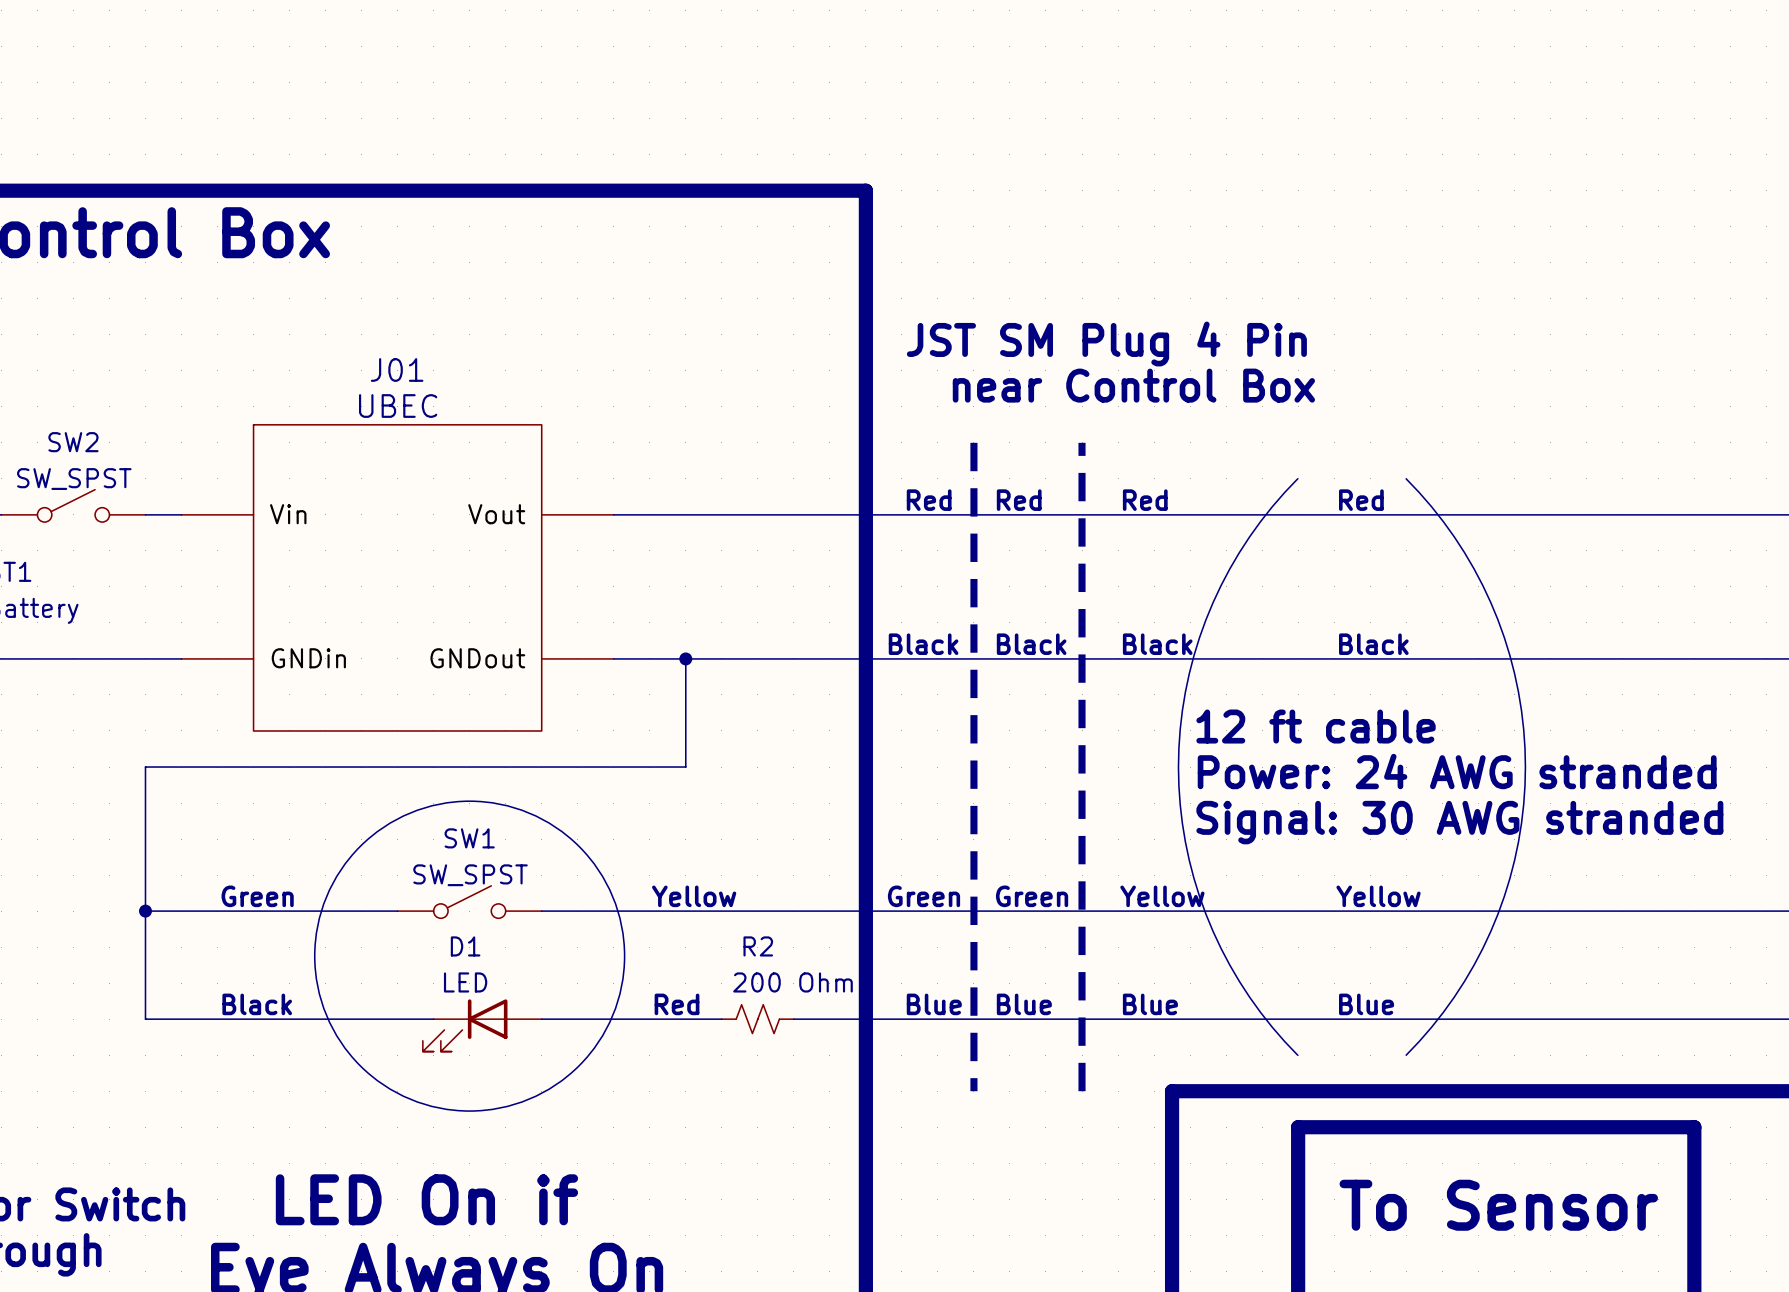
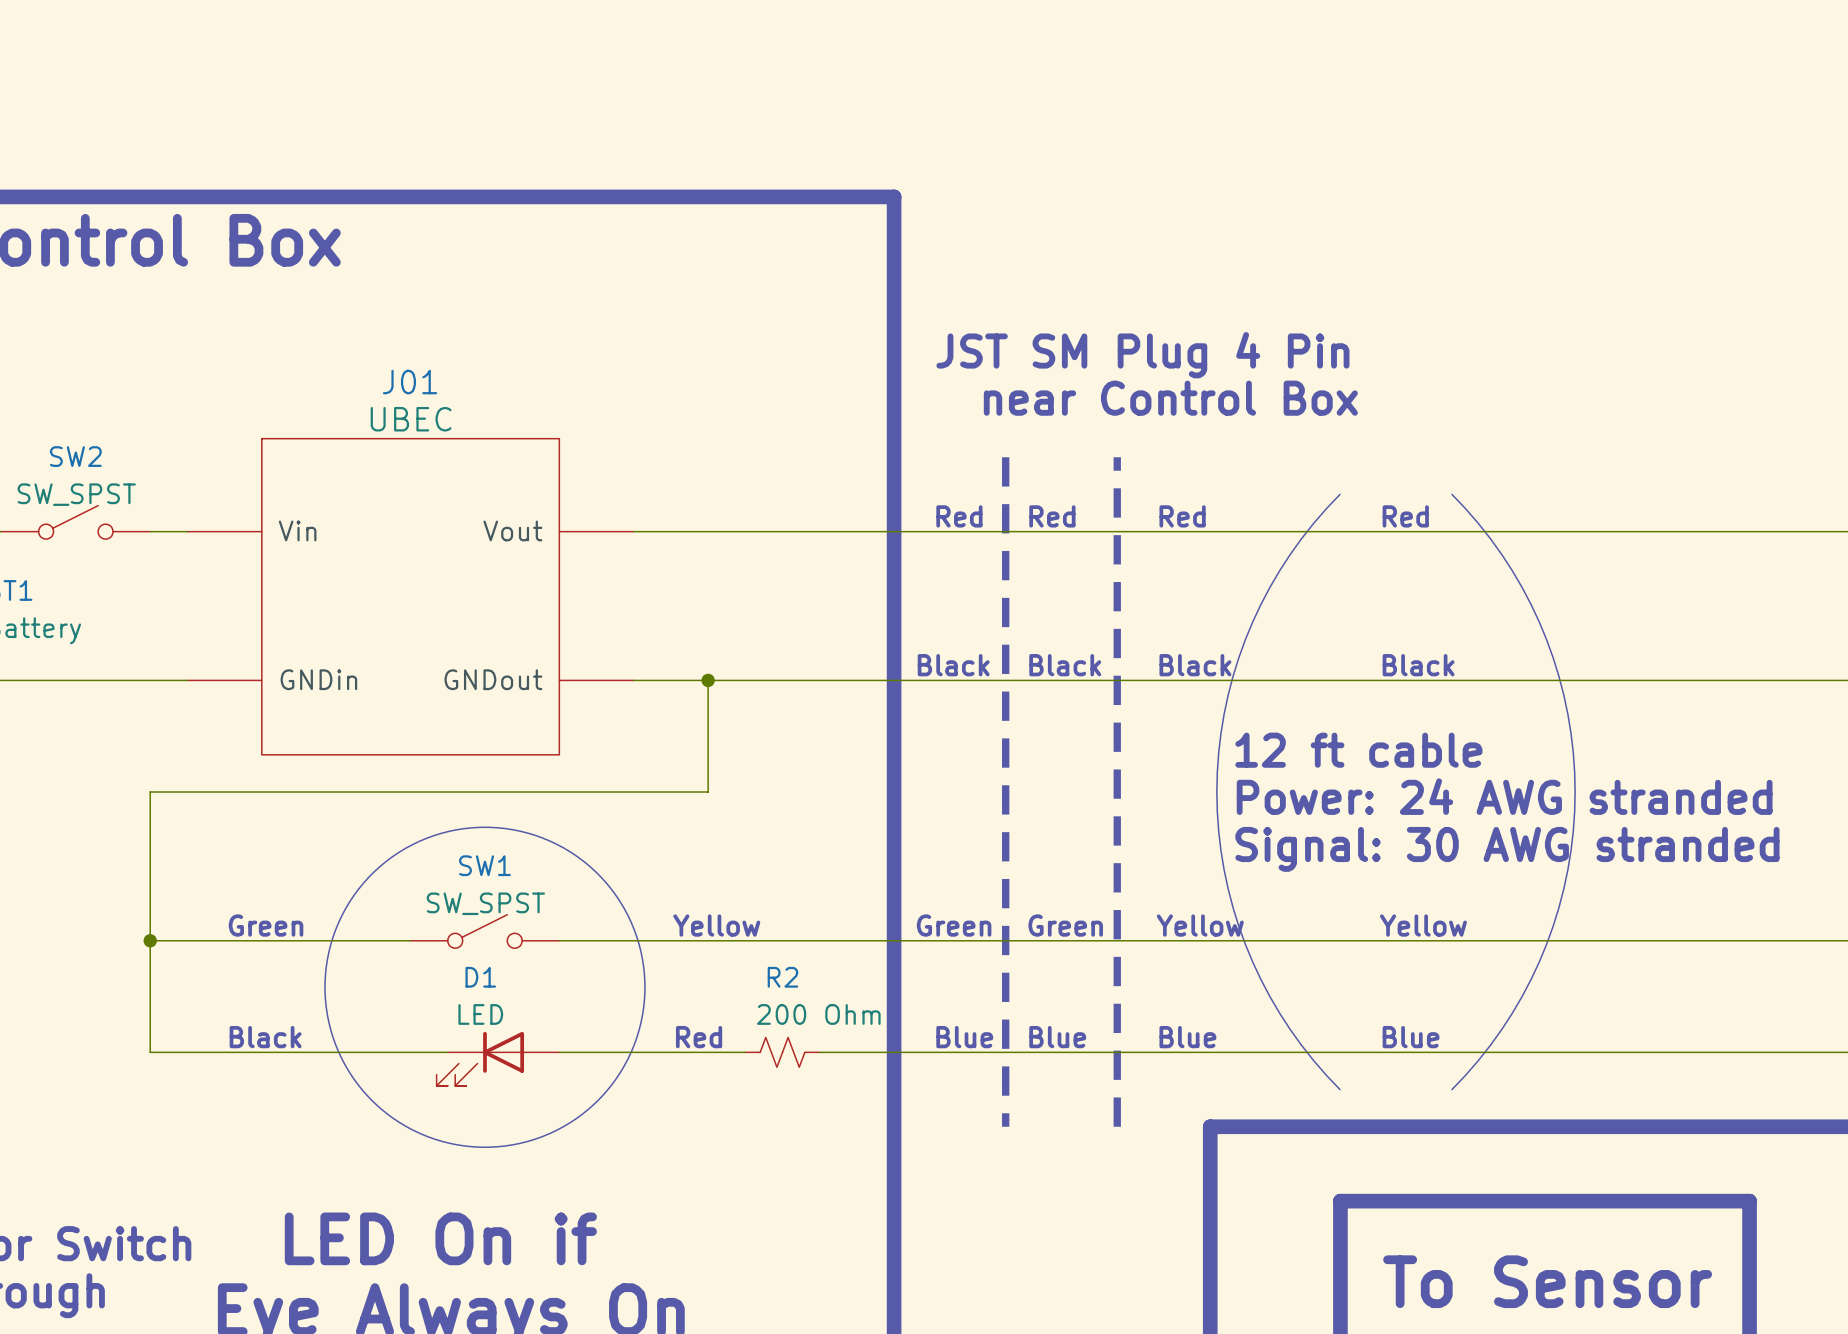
line: (1298, 1163) (1298, 1127) (1694, 1127) (1694, 1163) -> (1340, 1201) (1749, 1201)
text position: To Sensor (1498, 1205) -> To Sensor (1547, 1281)

